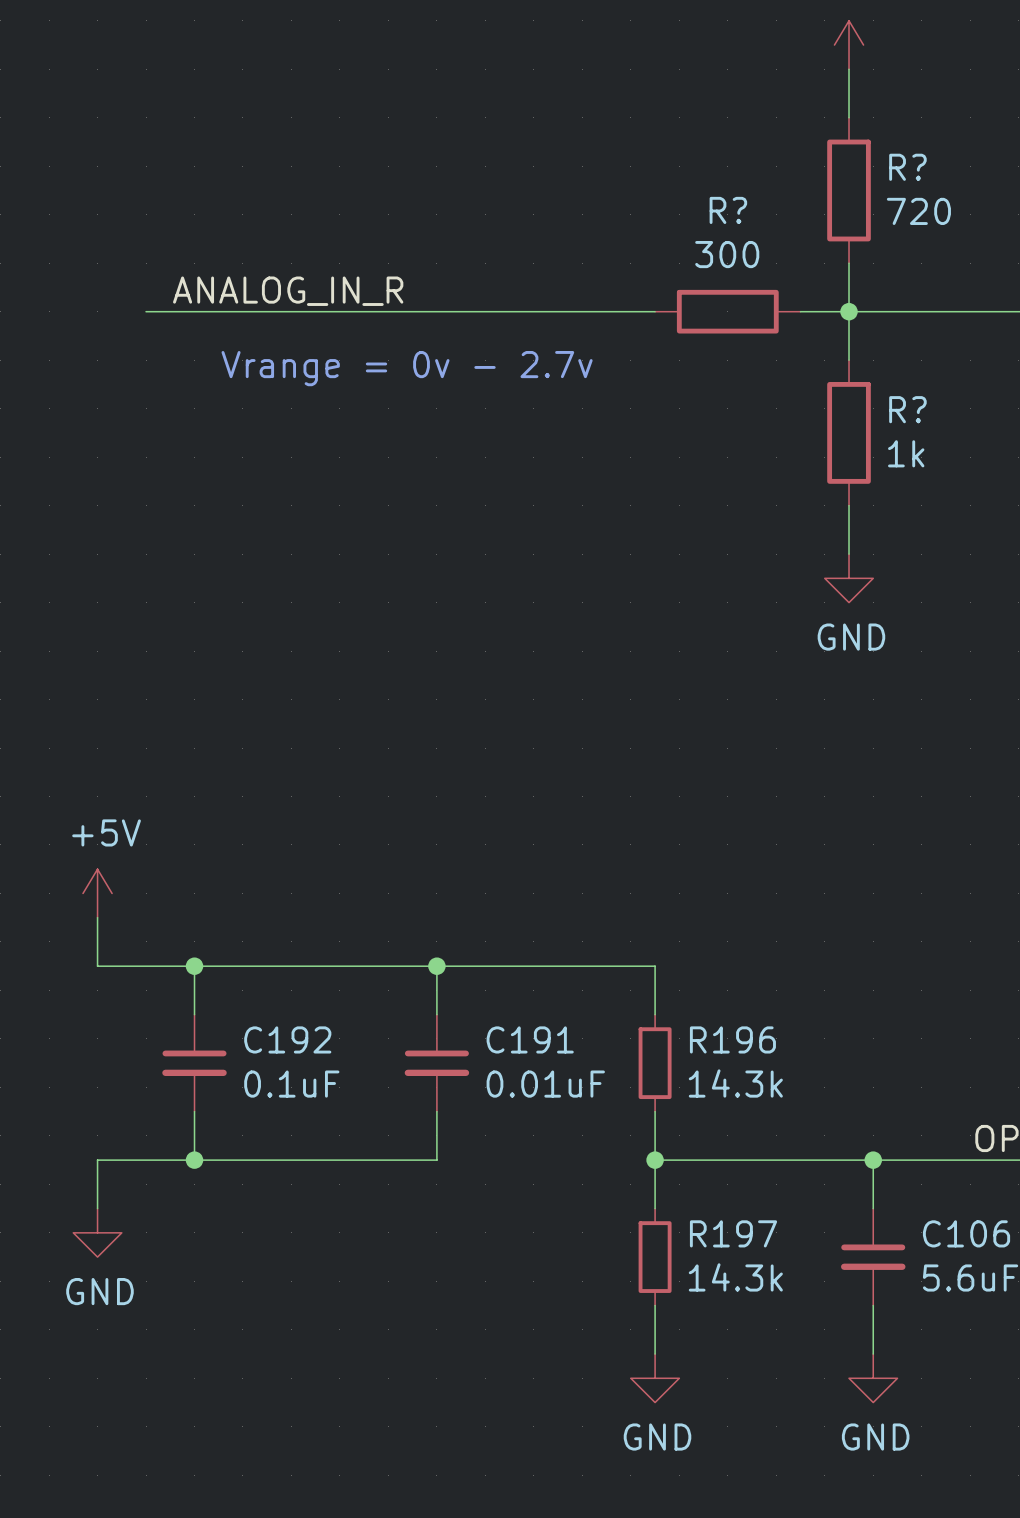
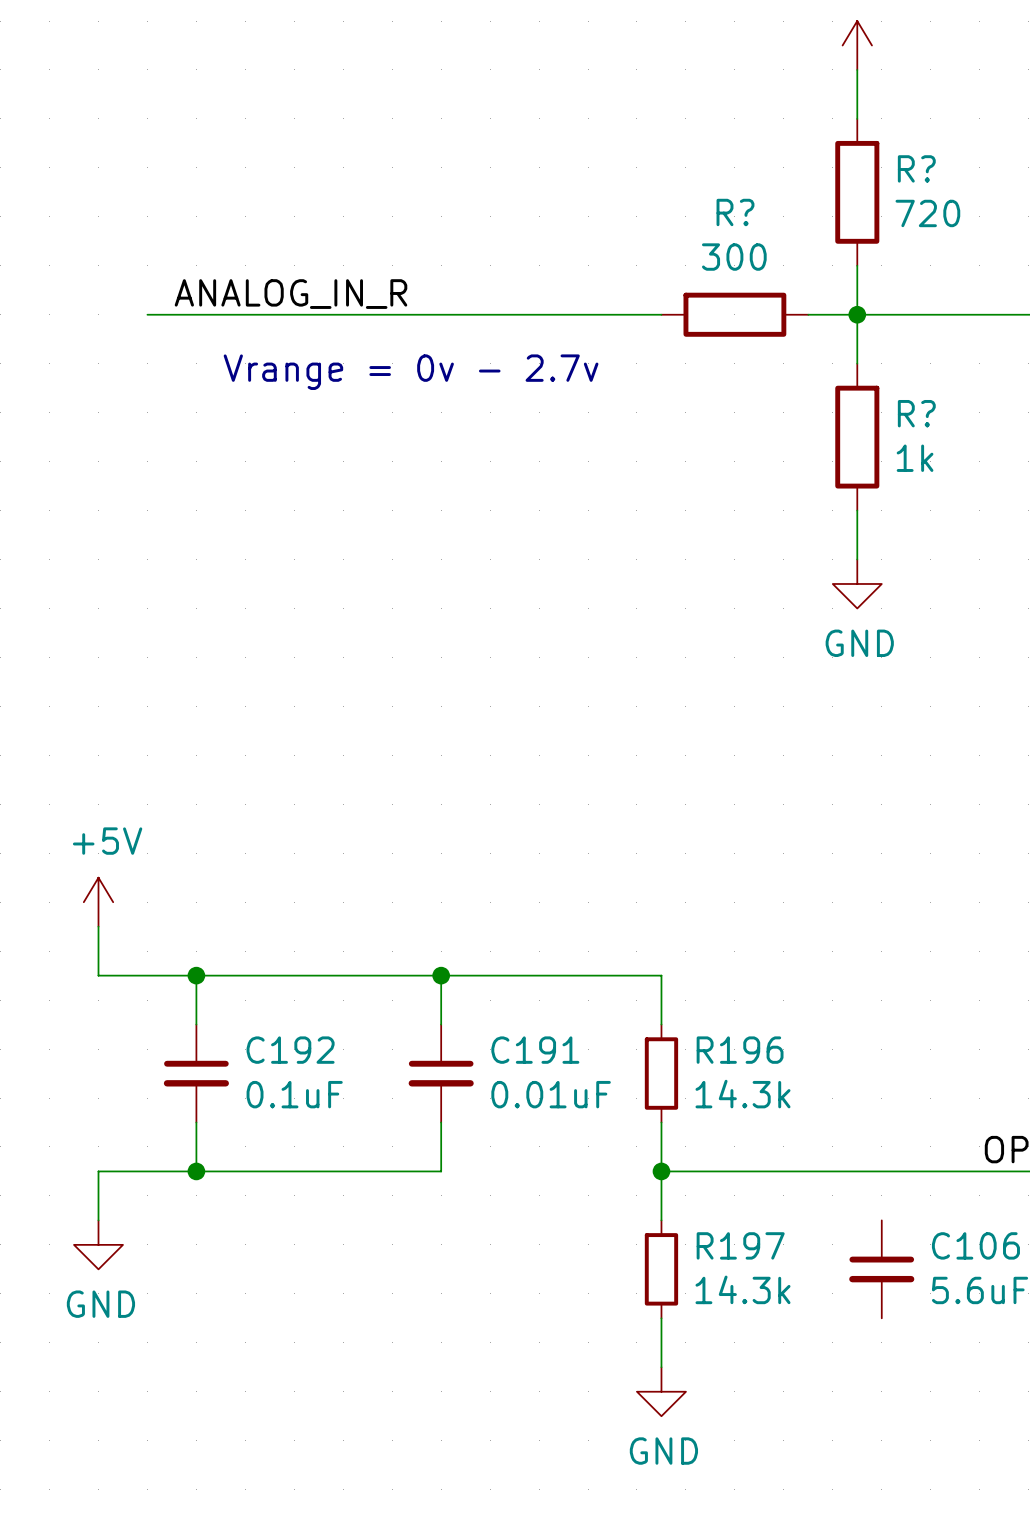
wire: (873, 1160) (873, 1208) -> none
junction: (873, 1160) -> none
wire: (873, 1305) (873, 1354) -> none
power symbol: GND (873, 1378) -> none

